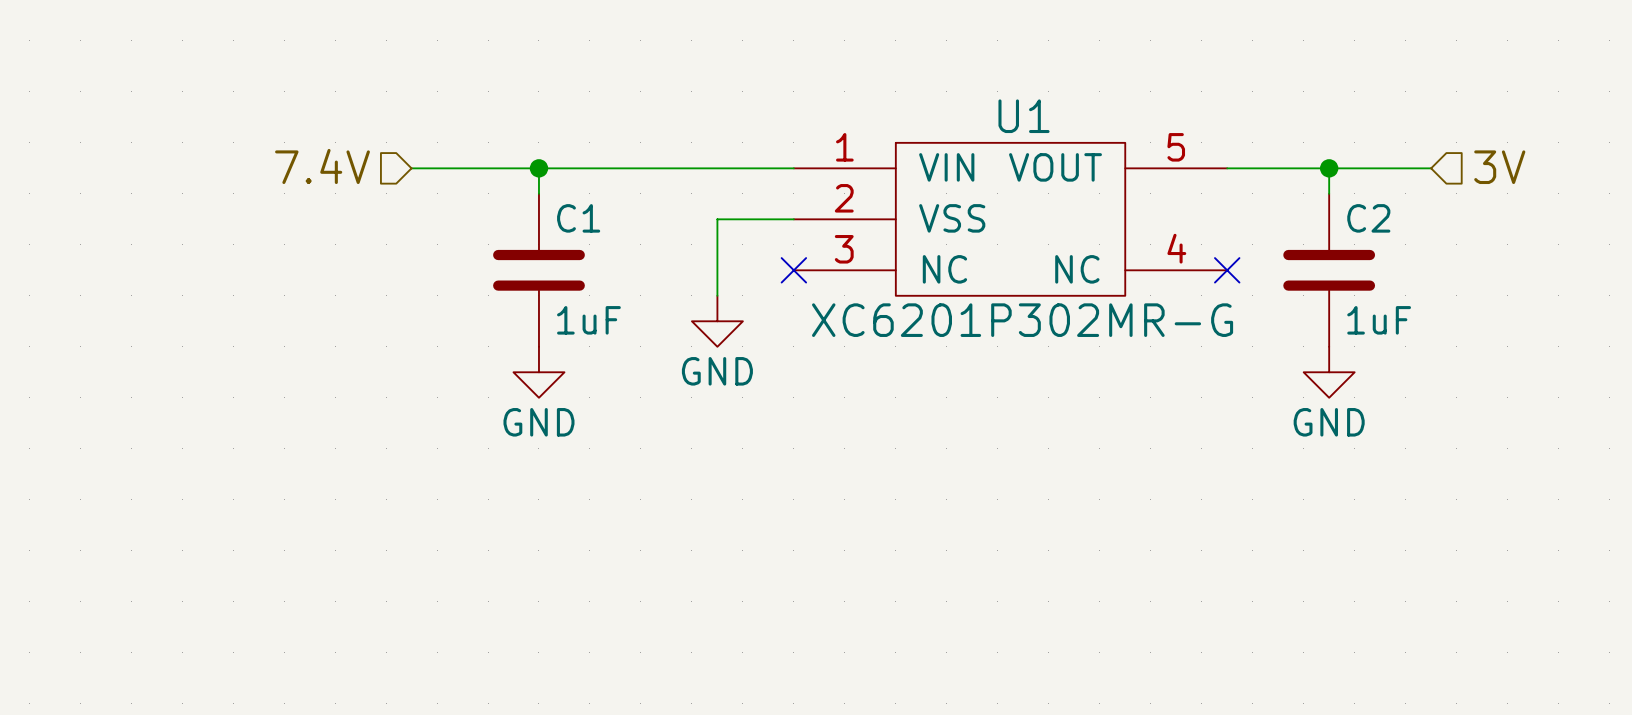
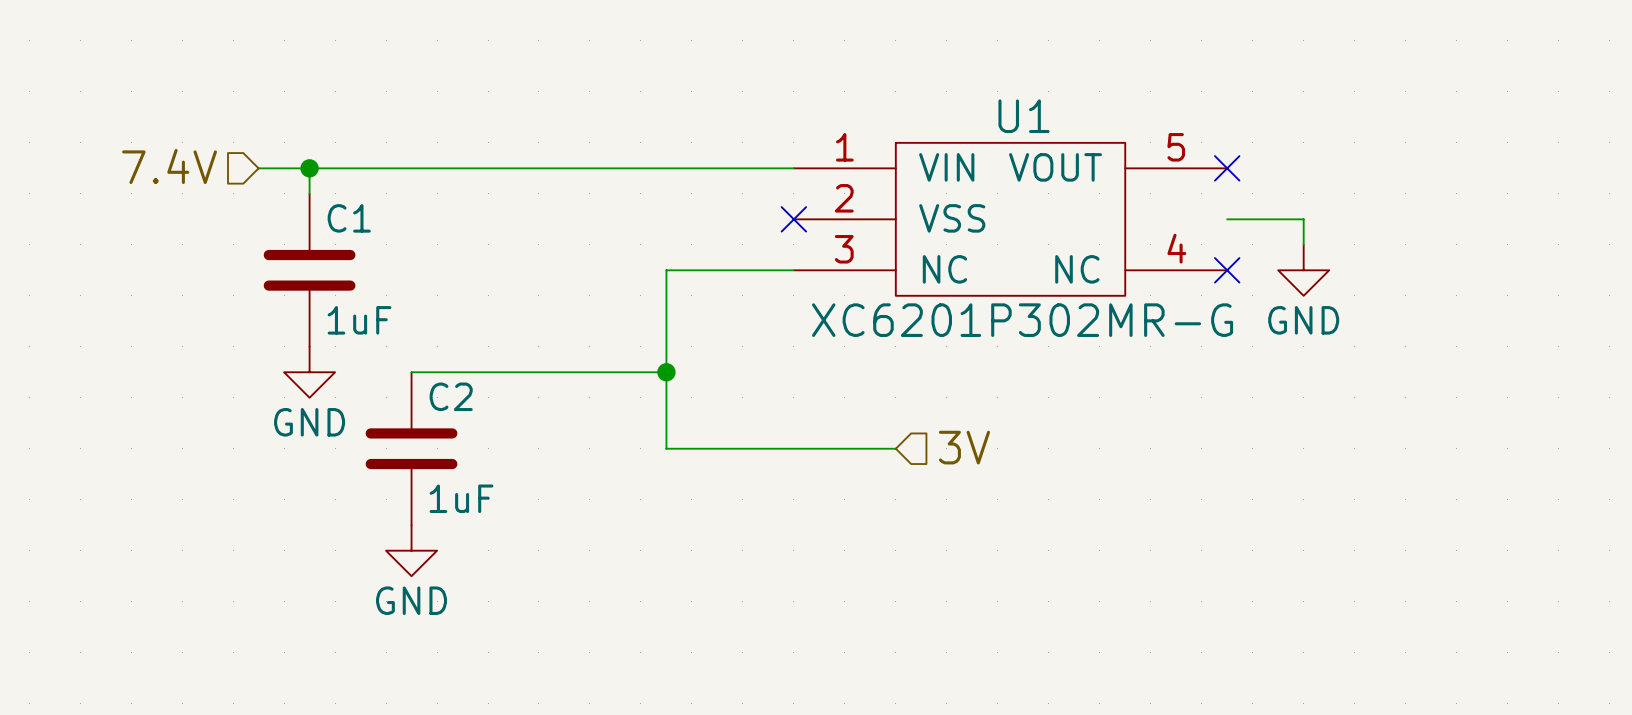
hierarchical label position: 7.4V (322, 166) -> 7.4V (169, 166)
hierarchical label: 3V (1499, 167) -> none
wire: none -> (258, 168) (411, 168)
junction: none -> (309, 168)
wire: (538, 168) (538, 193) -> (309, 168) (309, 193)
junction: (538, 168) -> none
wire: (1227, 168) (1431, 168) -> none
no-connect mark: none -> (1227, 168)
wire: (1329, 168) (1329, 193) -> none
junction: (1329, 168) -> none
wire: (793, 219) (717, 219) (717, 295) -> none
wire: none -> (1227, 219) (1303, 219) (1303, 244)
C1 position: (538, 270) -> (309, 270)
wire: none -> (793, 270) (666, 270) (666, 448) (895, 448)
no-connect mark position: (793, 270) -> (793, 219)
C2 position: (1329, 270) -> (411, 448)
power symbol: GND (717, 321) -> none
power symbol: none -> GND (309, 372)
wire: none -> (411, 372) (666, 372)
power symbol: GND (538, 372) -> none
junction: none -> (666, 372)
power symbol position: GND (1329, 372) -> GND (1303, 270)
hierarchical label: none -> 3V (964, 447)
power symbol: none -> GND (411, 550)

